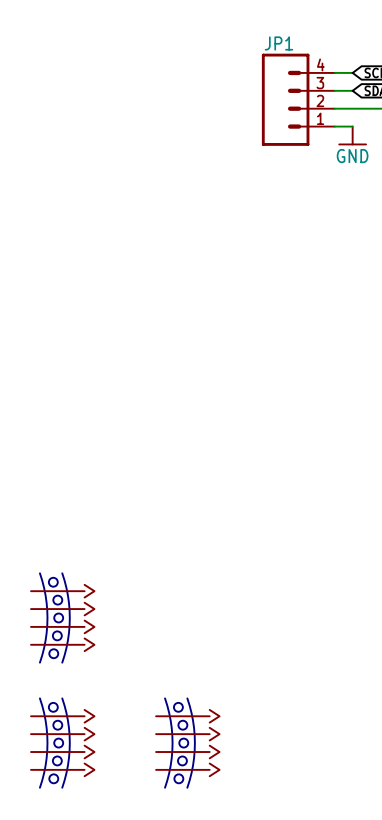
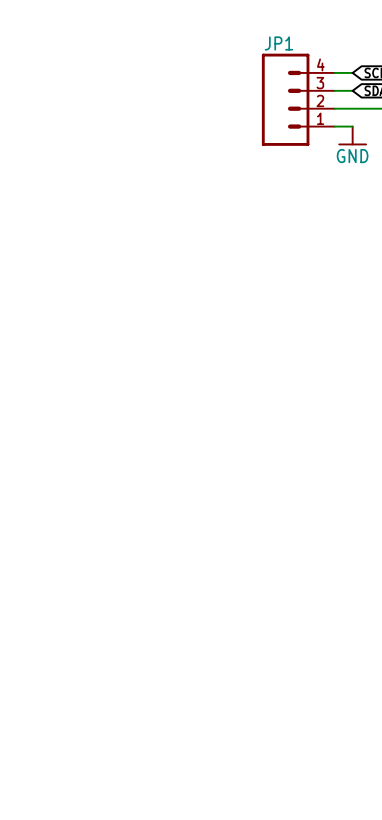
part: (62, 617) -> none
part: (62, 743) -> none
part: (187, 743) -> none

